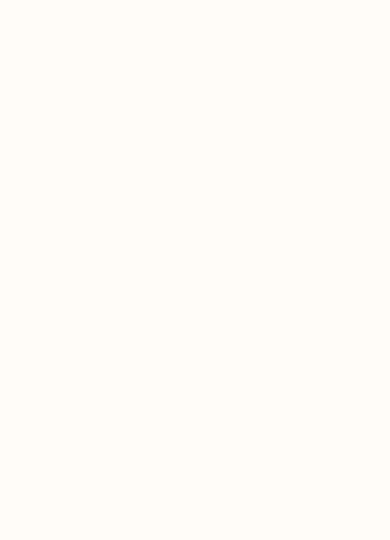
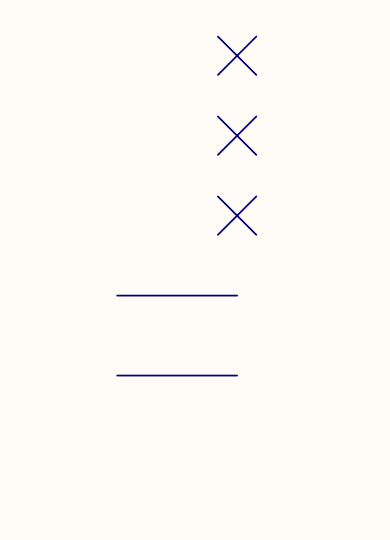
no-connect mark: none -> (237, 55)
no-connect mark: none -> (237, 135)
no-connect mark: none -> (237, 215)
wire: none -> (117, 295) (237, 295)
wire: none -> (117, 375) (237, 375)

